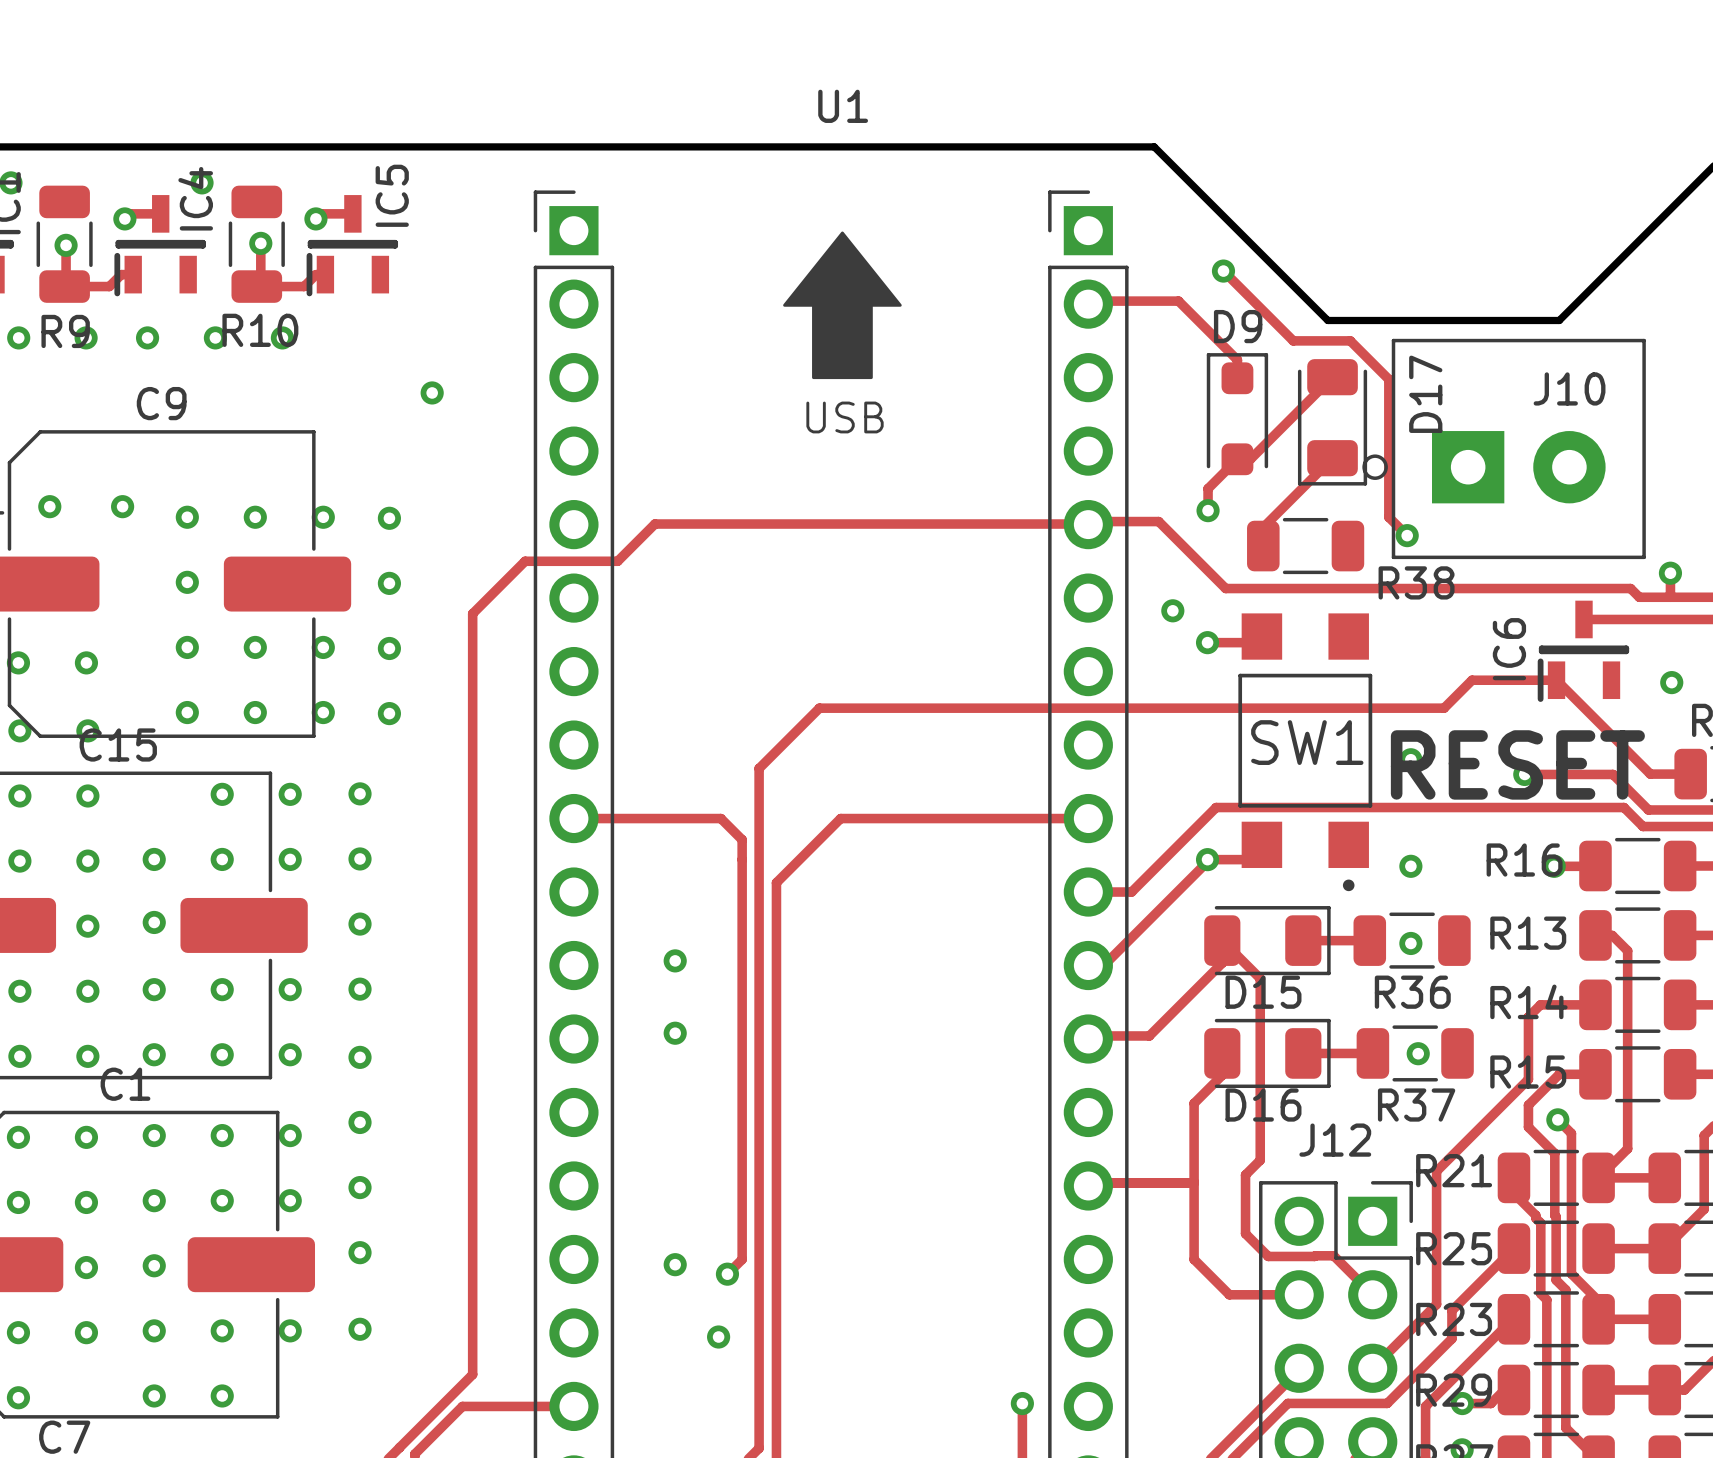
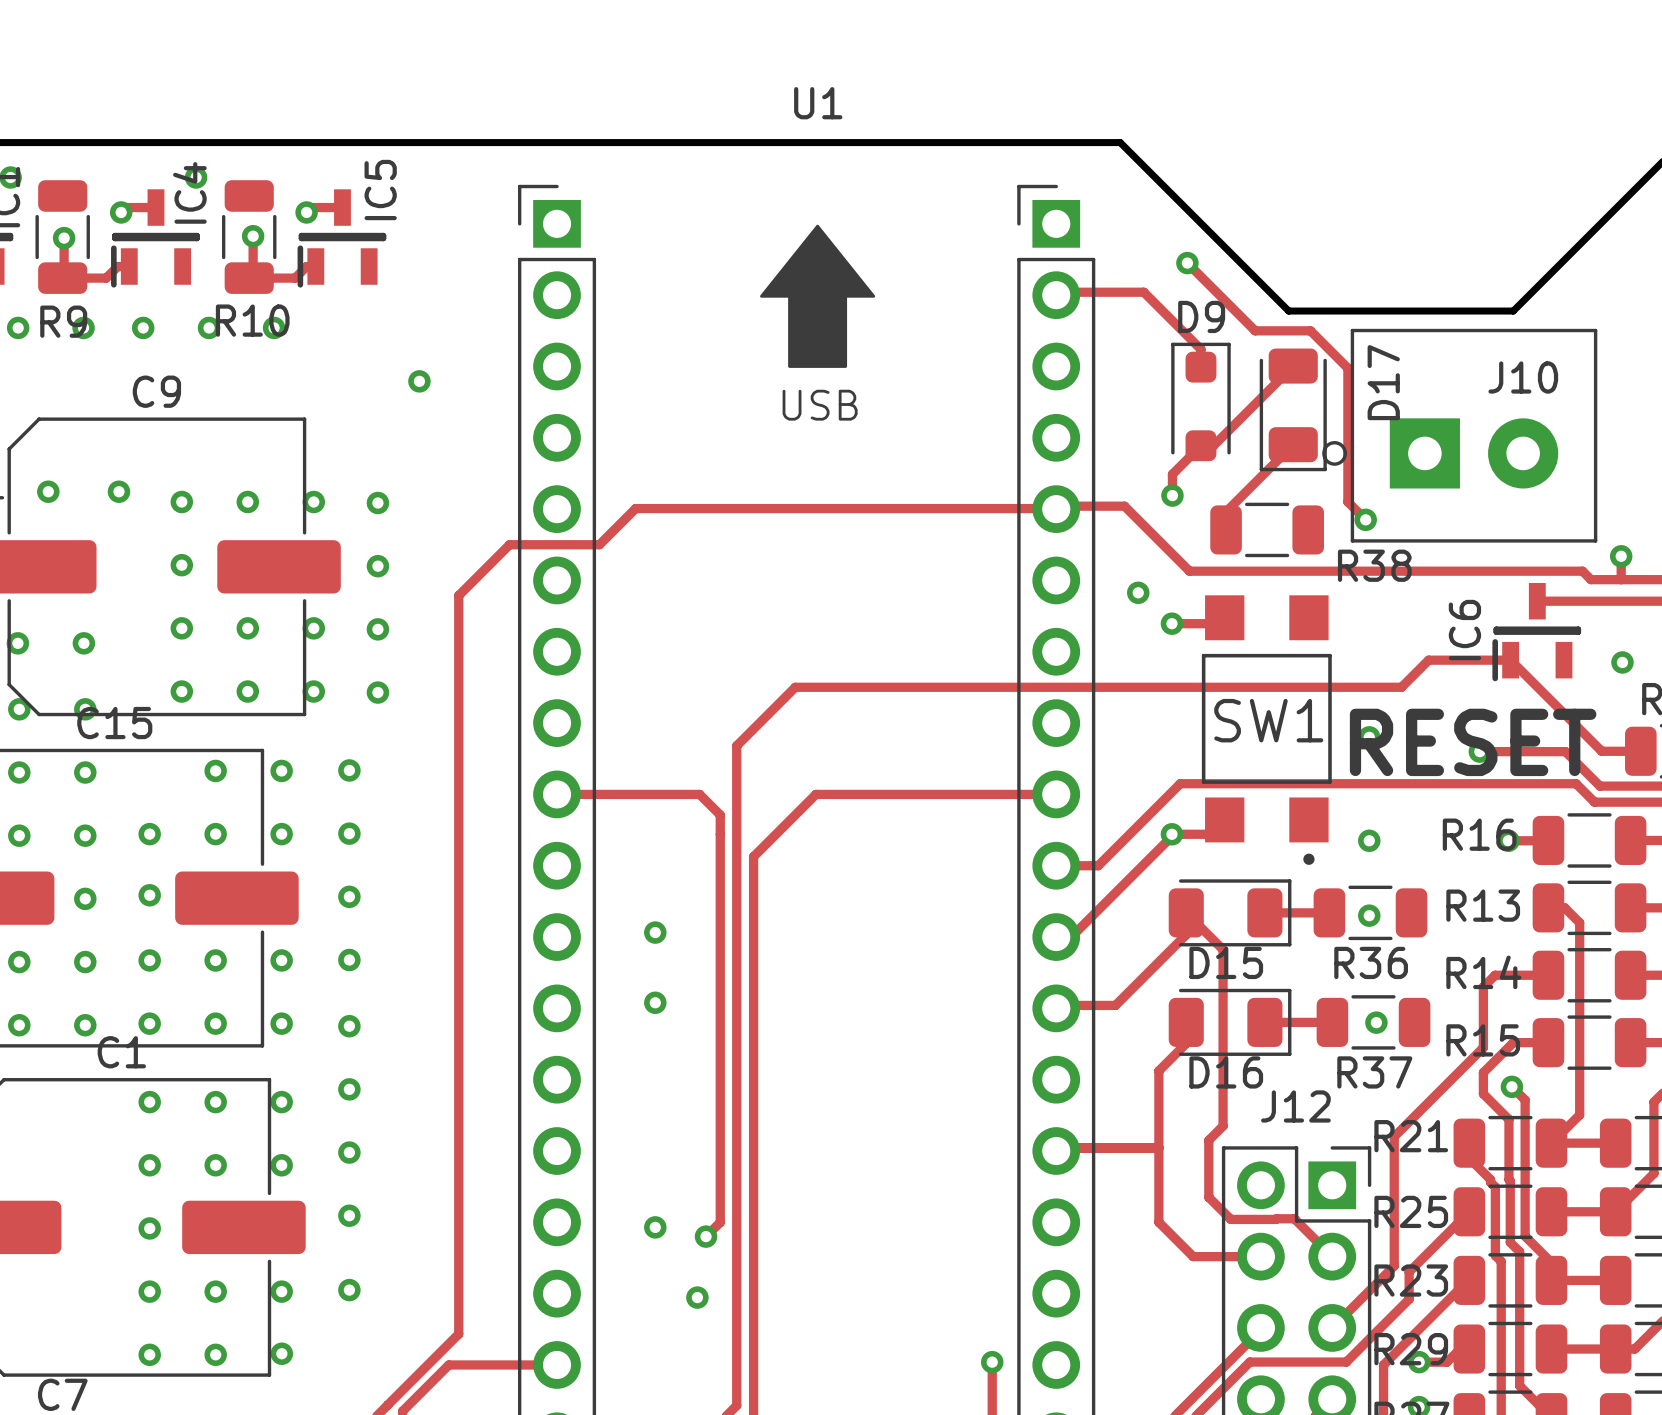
via: (18, 1137) -> none
via: (86, 1137) -> none
via: (18, 1202) -> none
via: (86, 1202) -> none
via: (86, 1267) -> none
via: (18, 1332) -> none
via: (86, 1332) -> none
via: none -> (281, 1353)
via: (18, 1397) -> none

